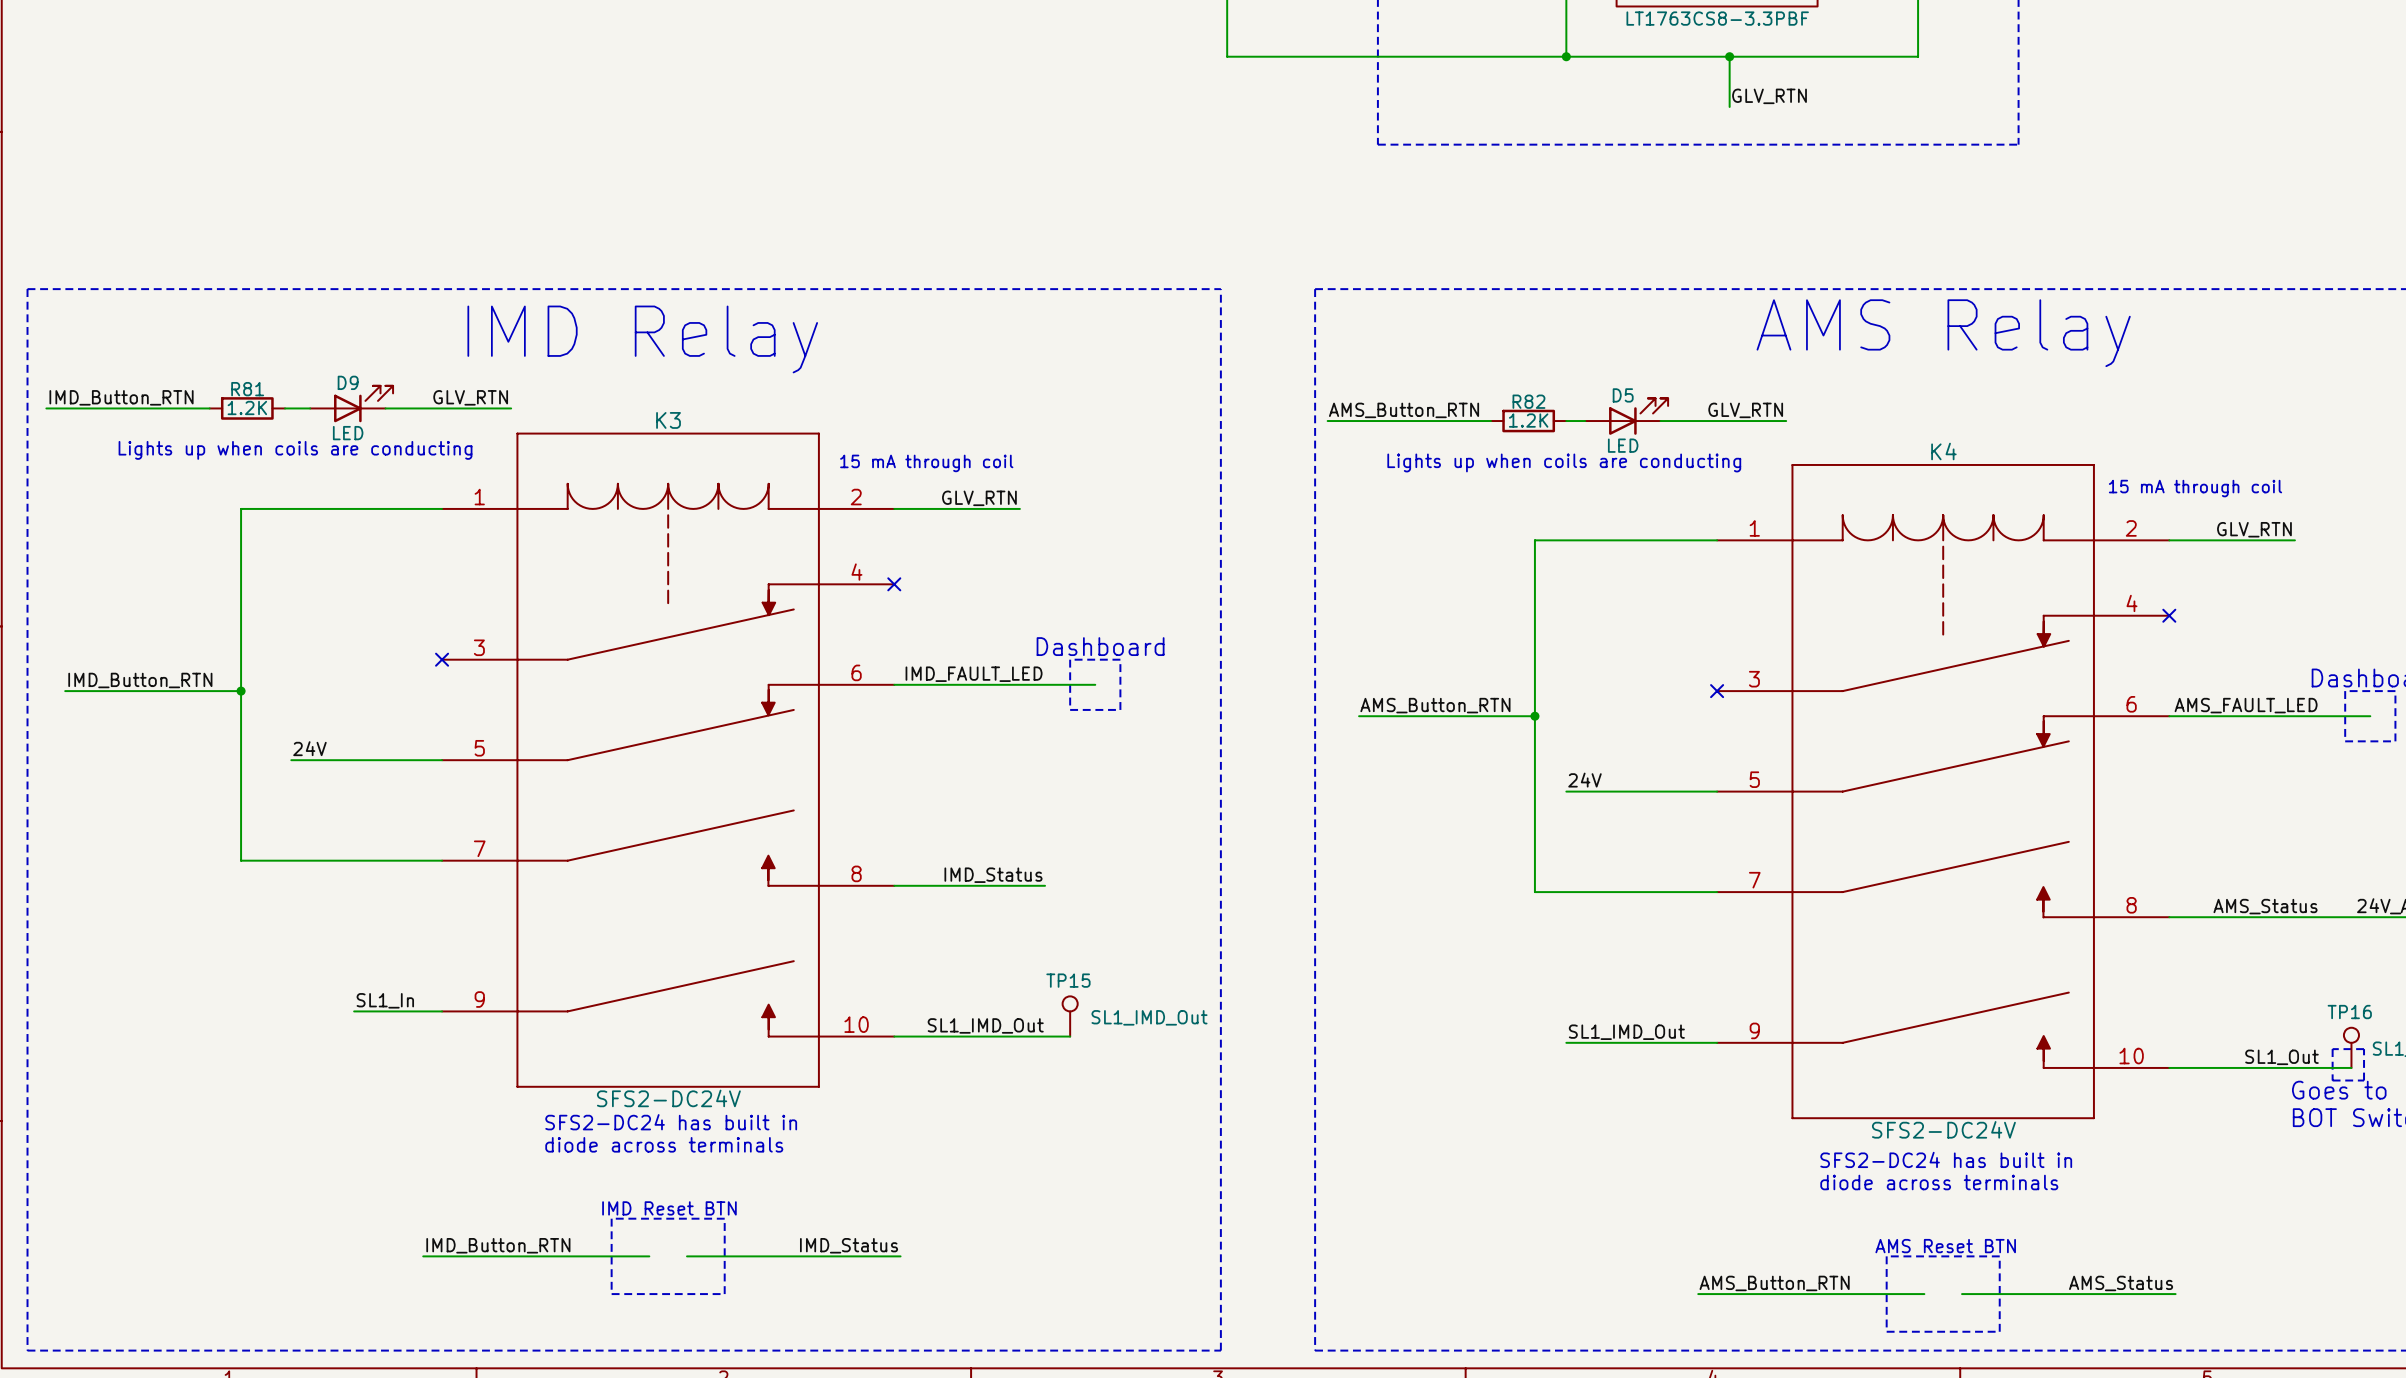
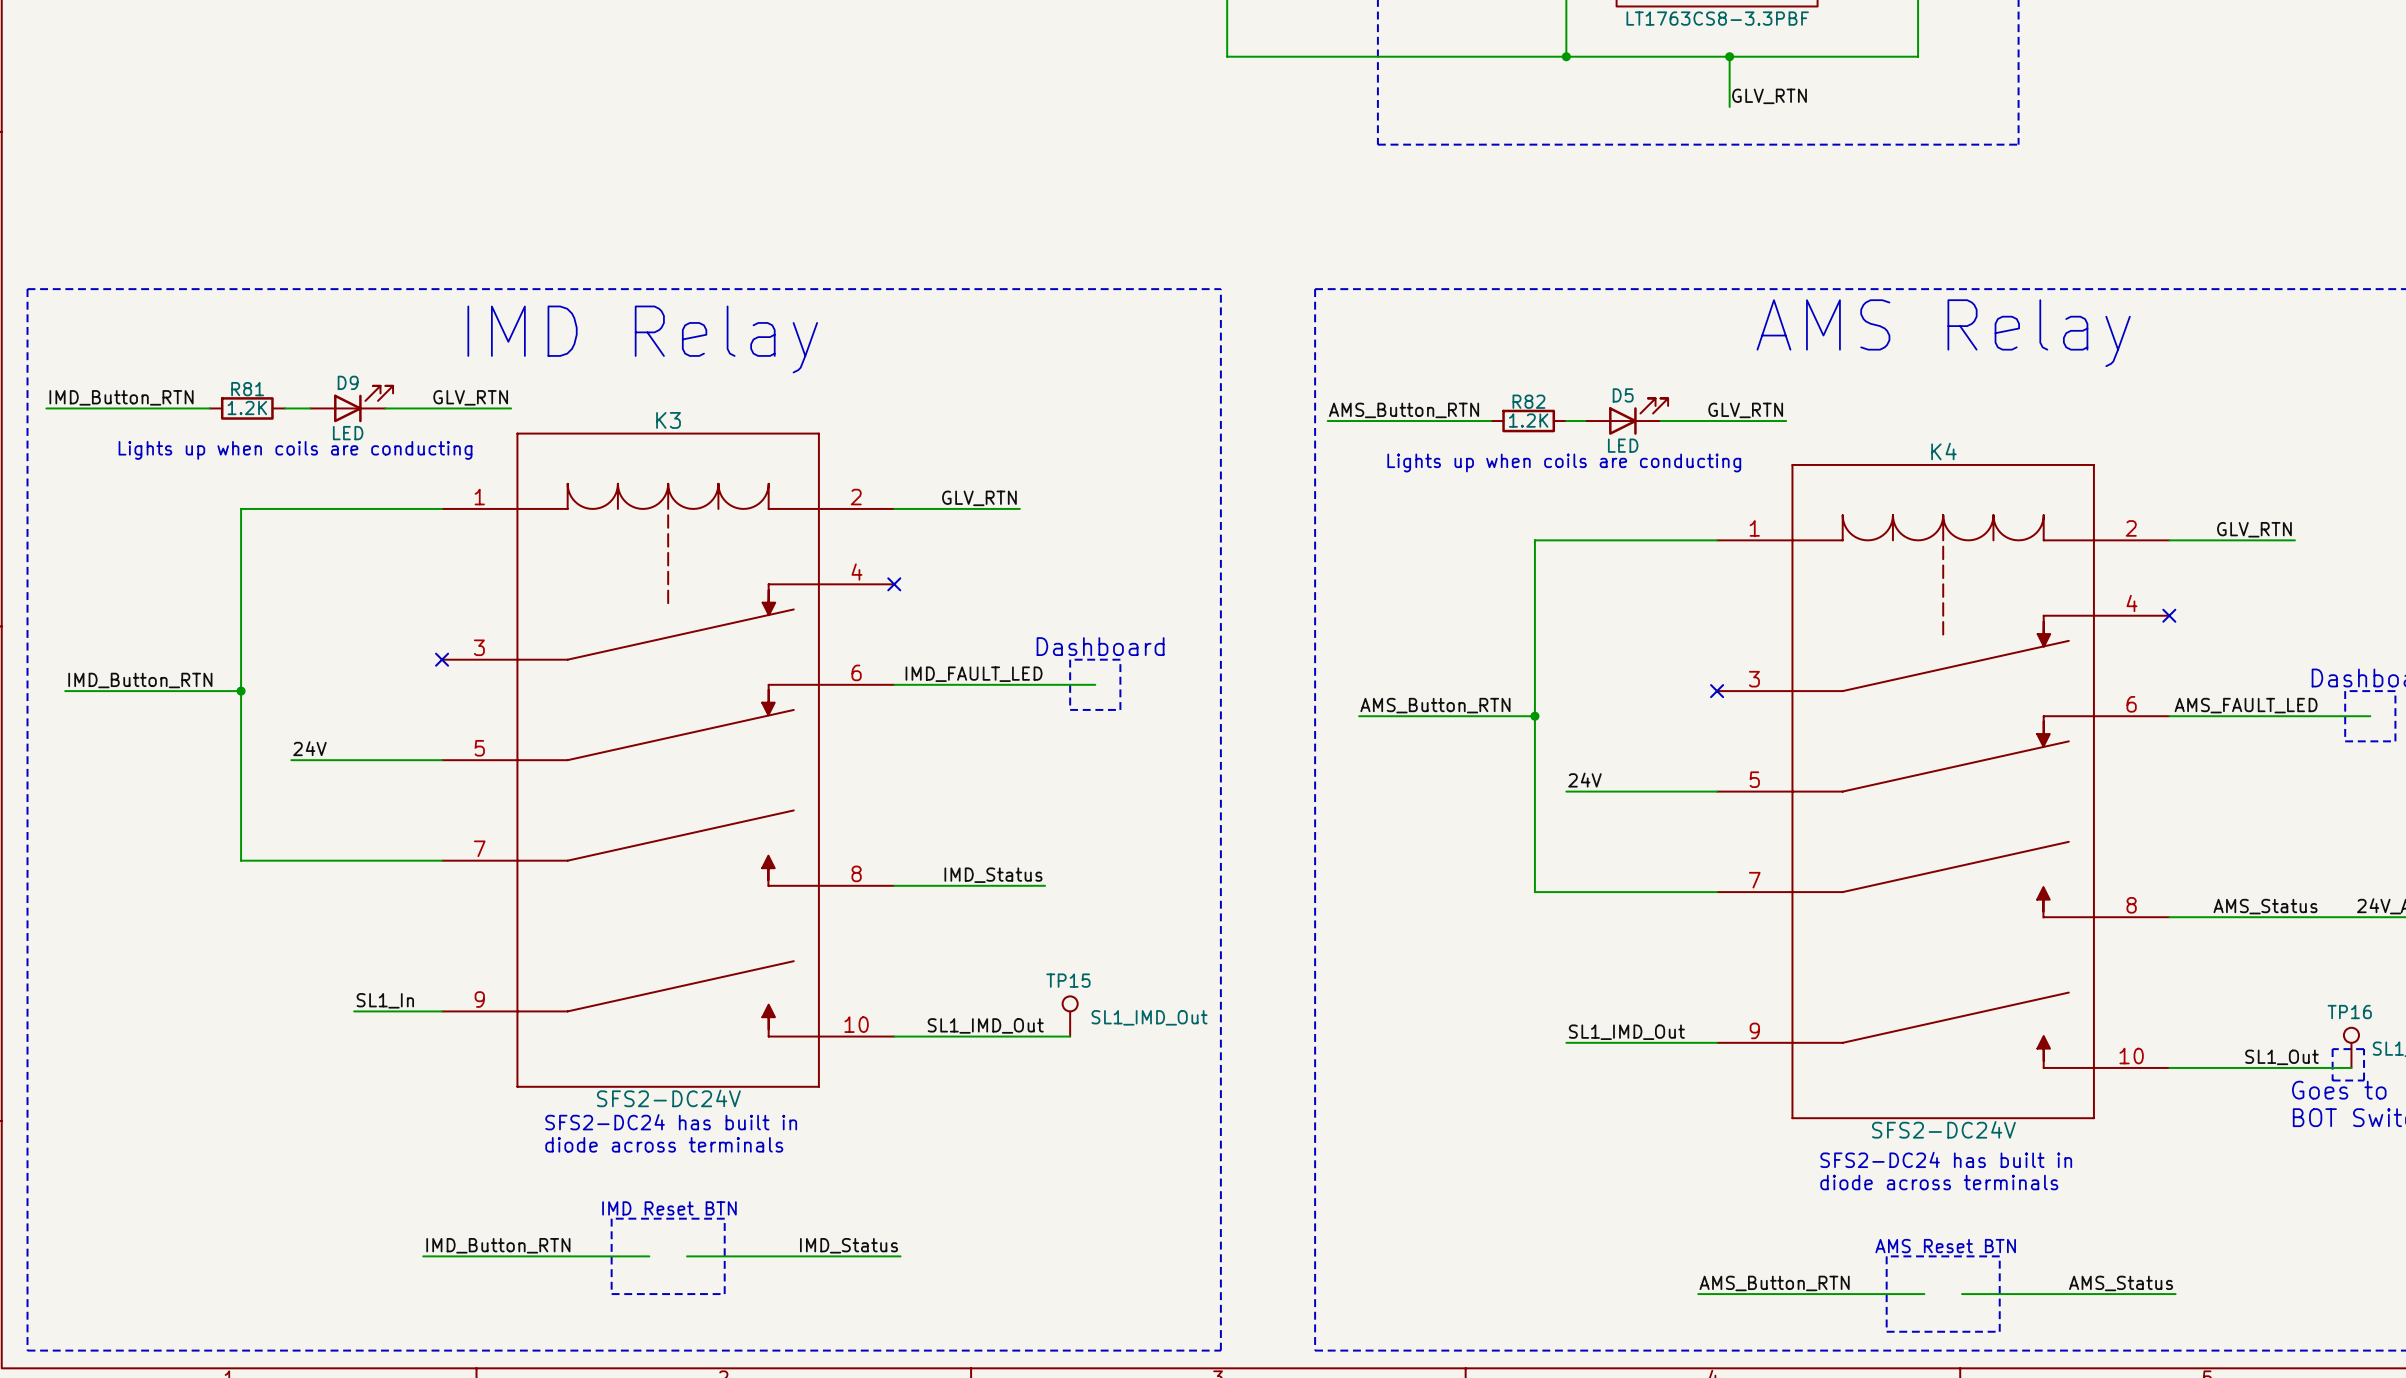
text: 15 mA through coil (926, 463) -> none
text: 15 mA through coil (2195, 488) -> none

